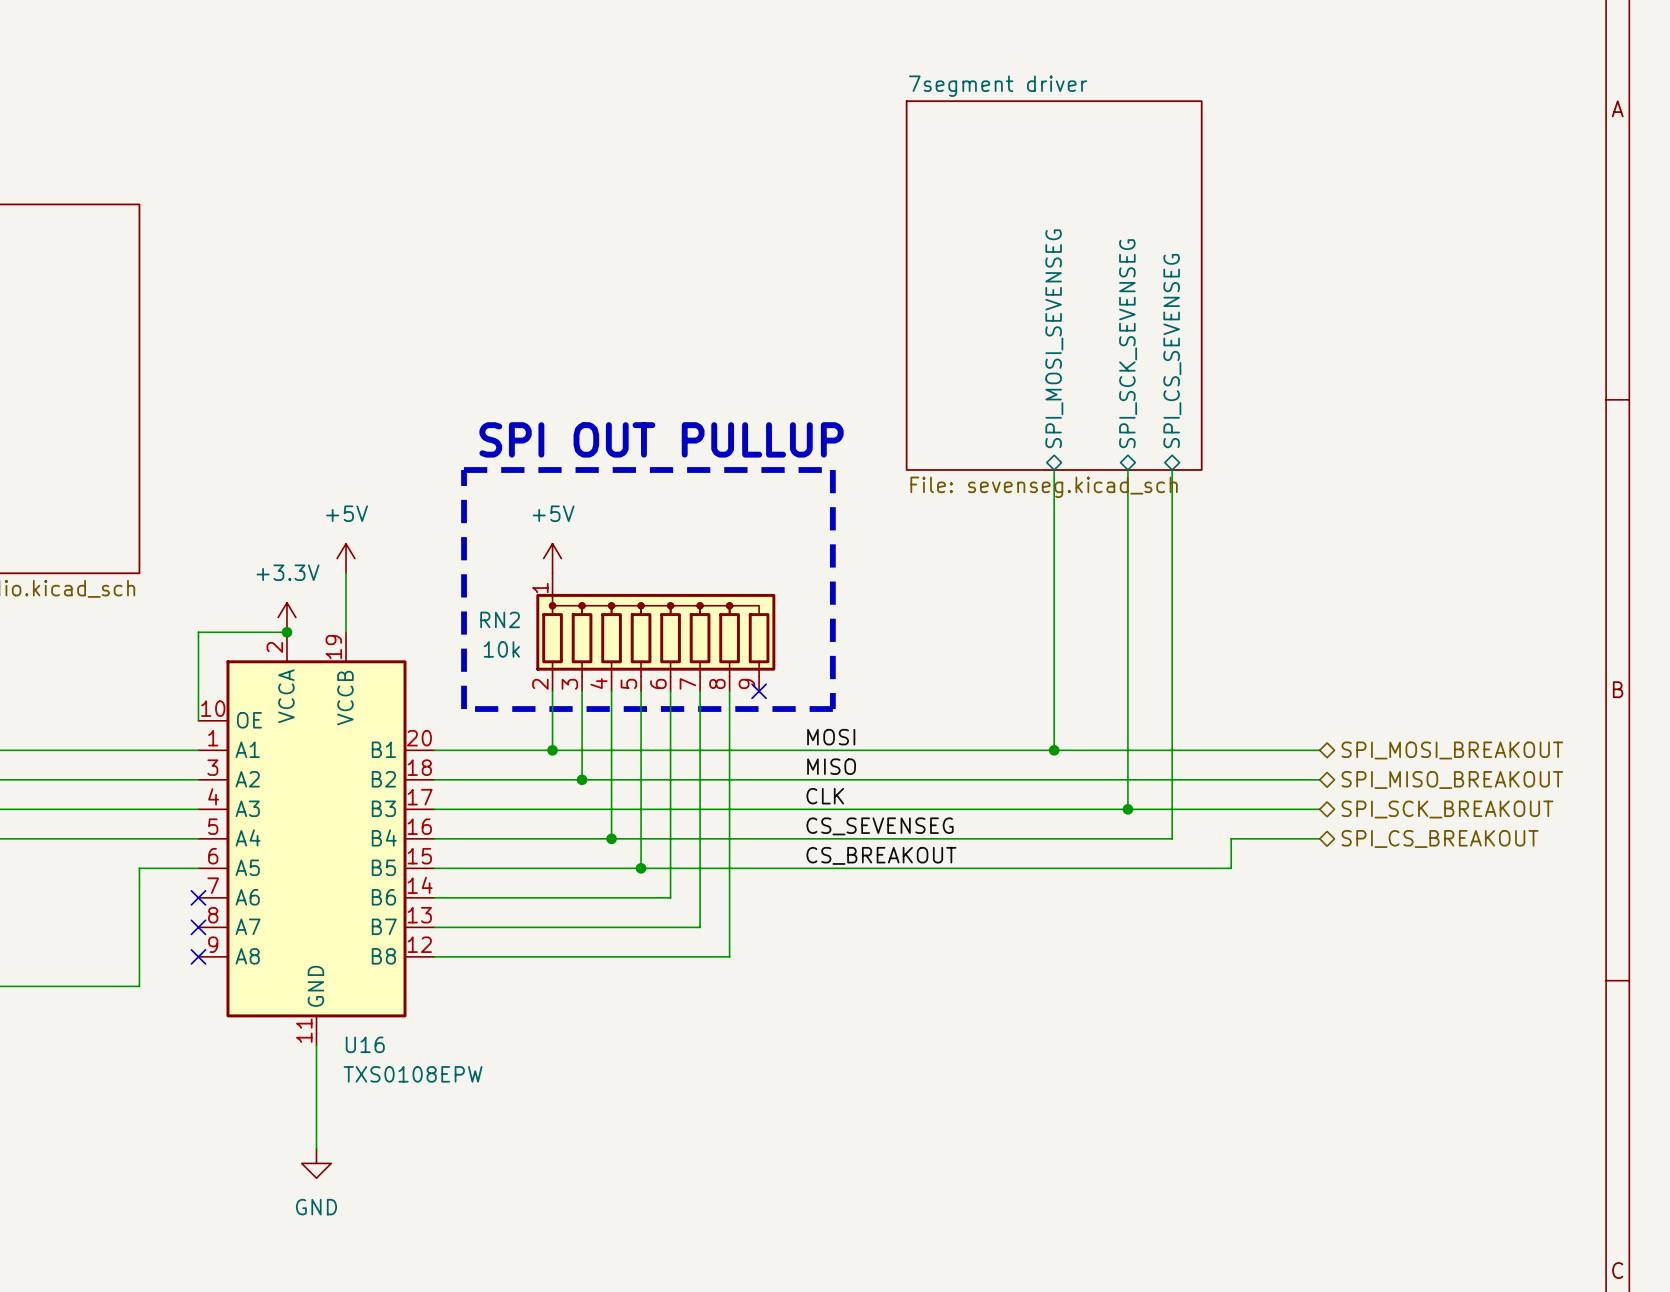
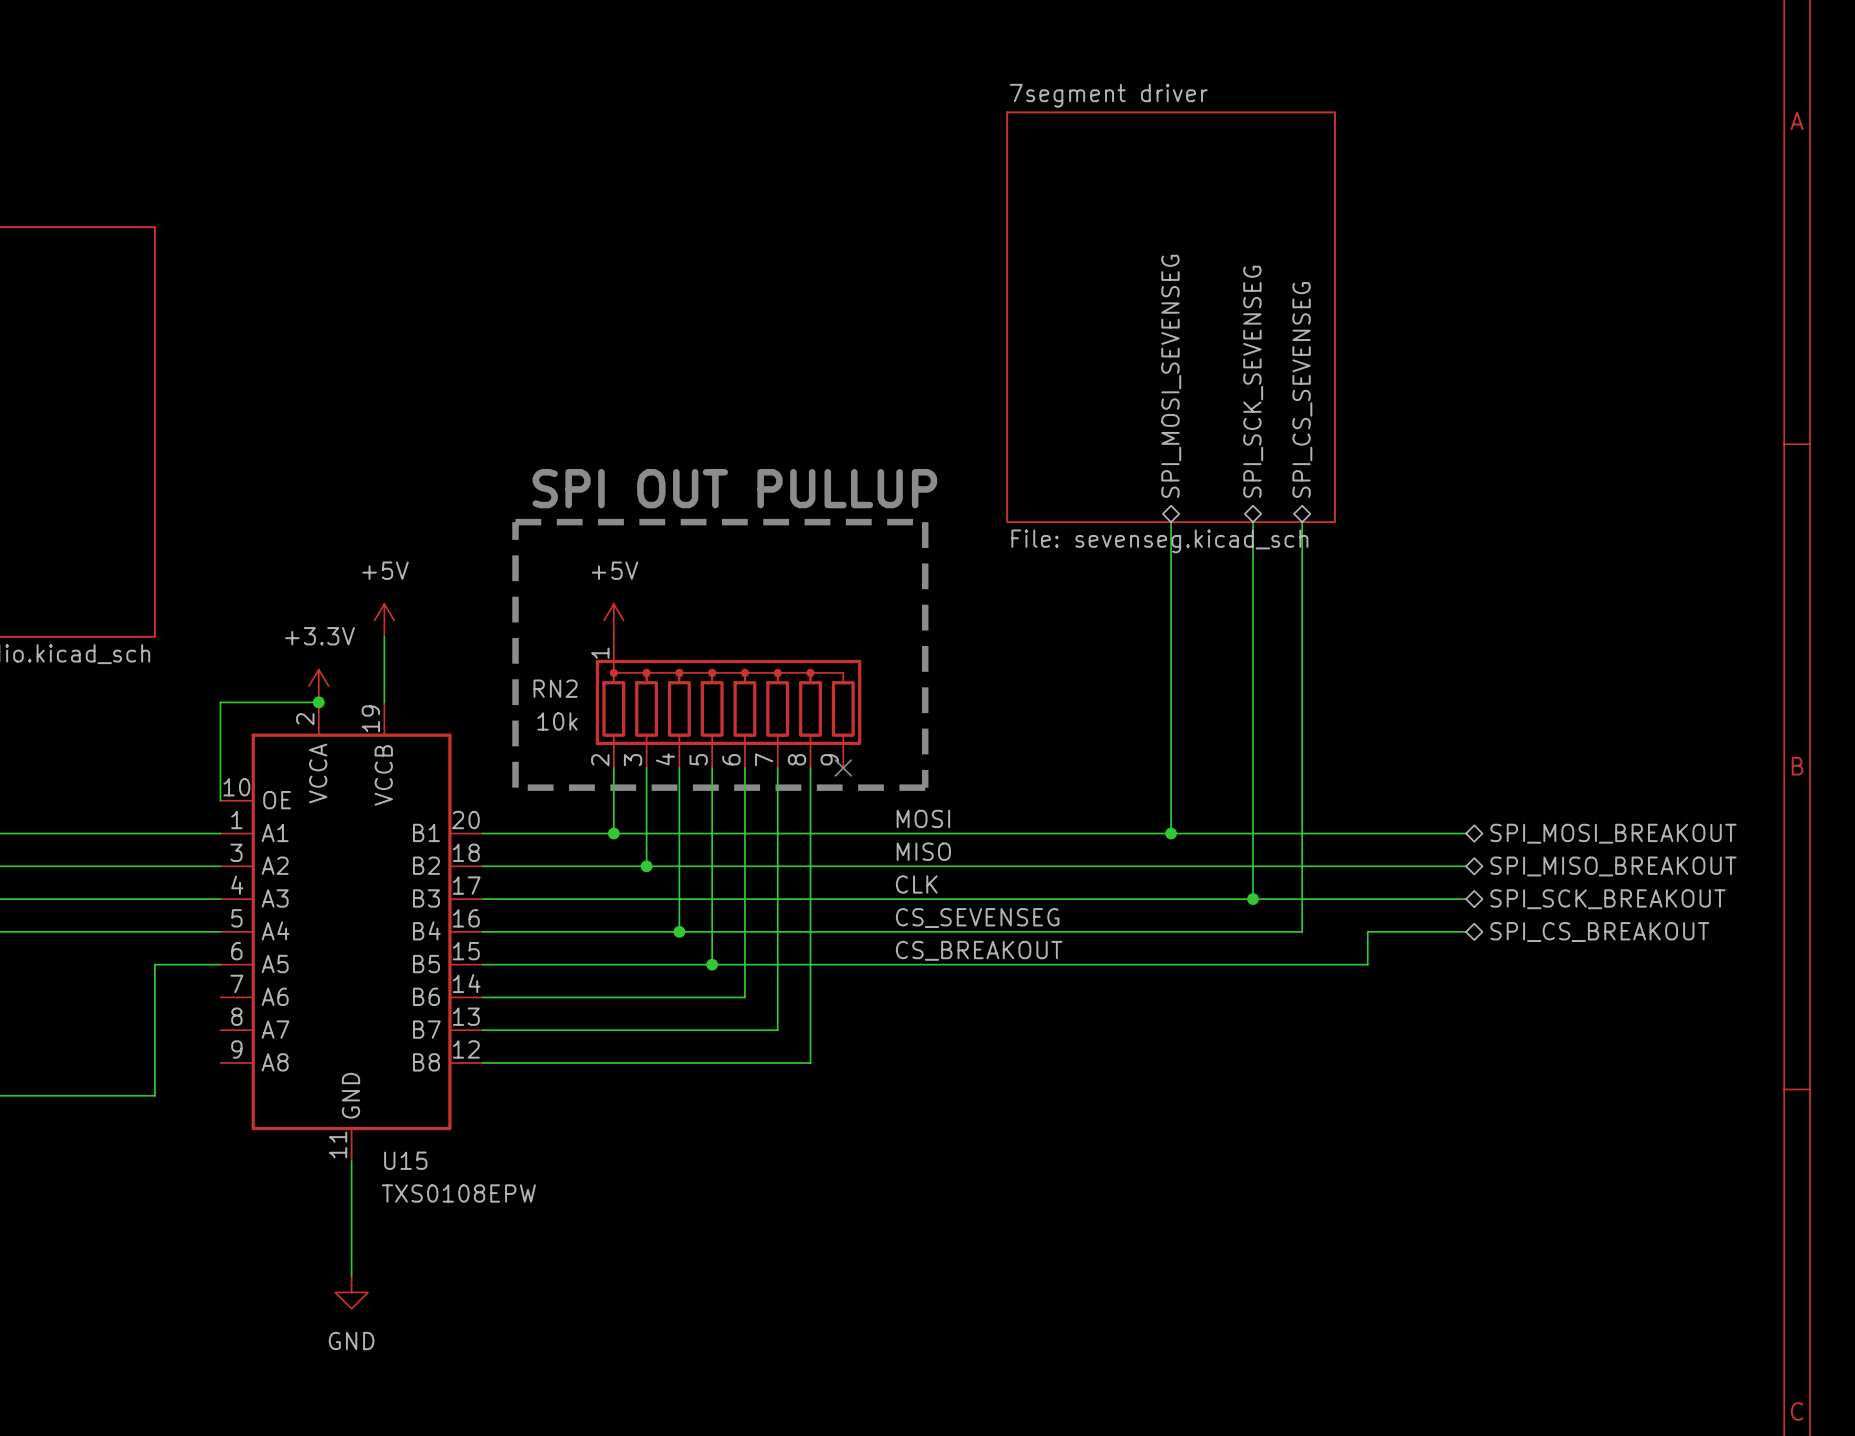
no-connect mark: (198, 897) -> none
no-connect mark: (198, 927) -> none
no-connect mark: (198, 956) -> none
U16 name: U16 (365, 1044) -> U15 (405, 1160)

